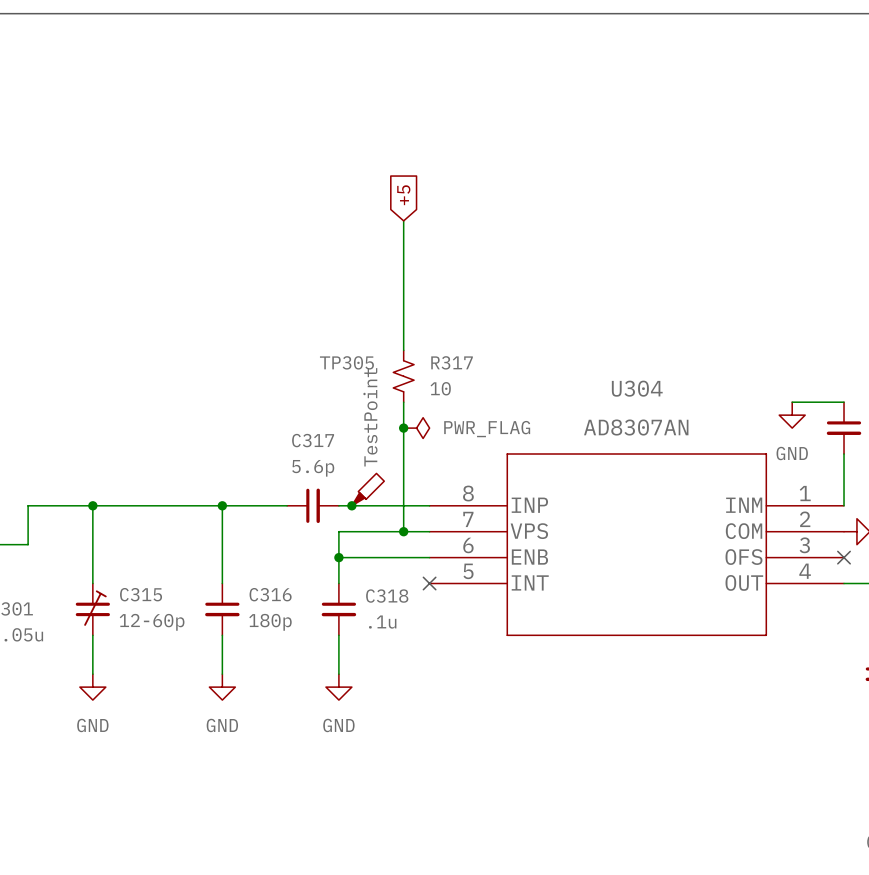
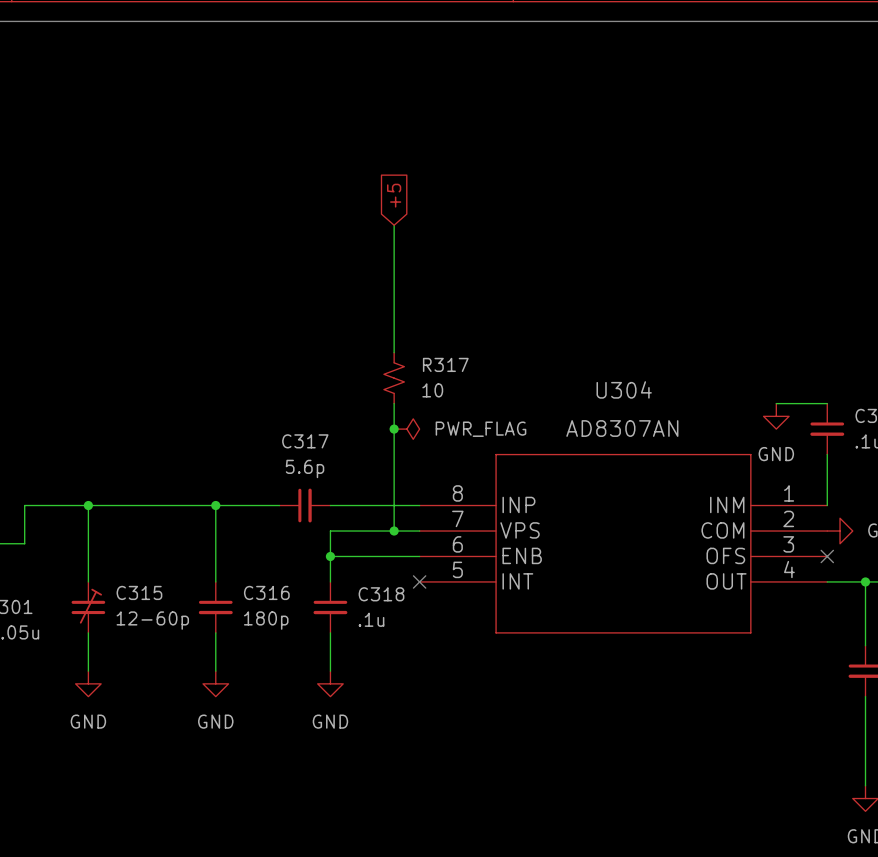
TP305: TestPoint (368, 489) -> none
junction: (351, 505) -> none

